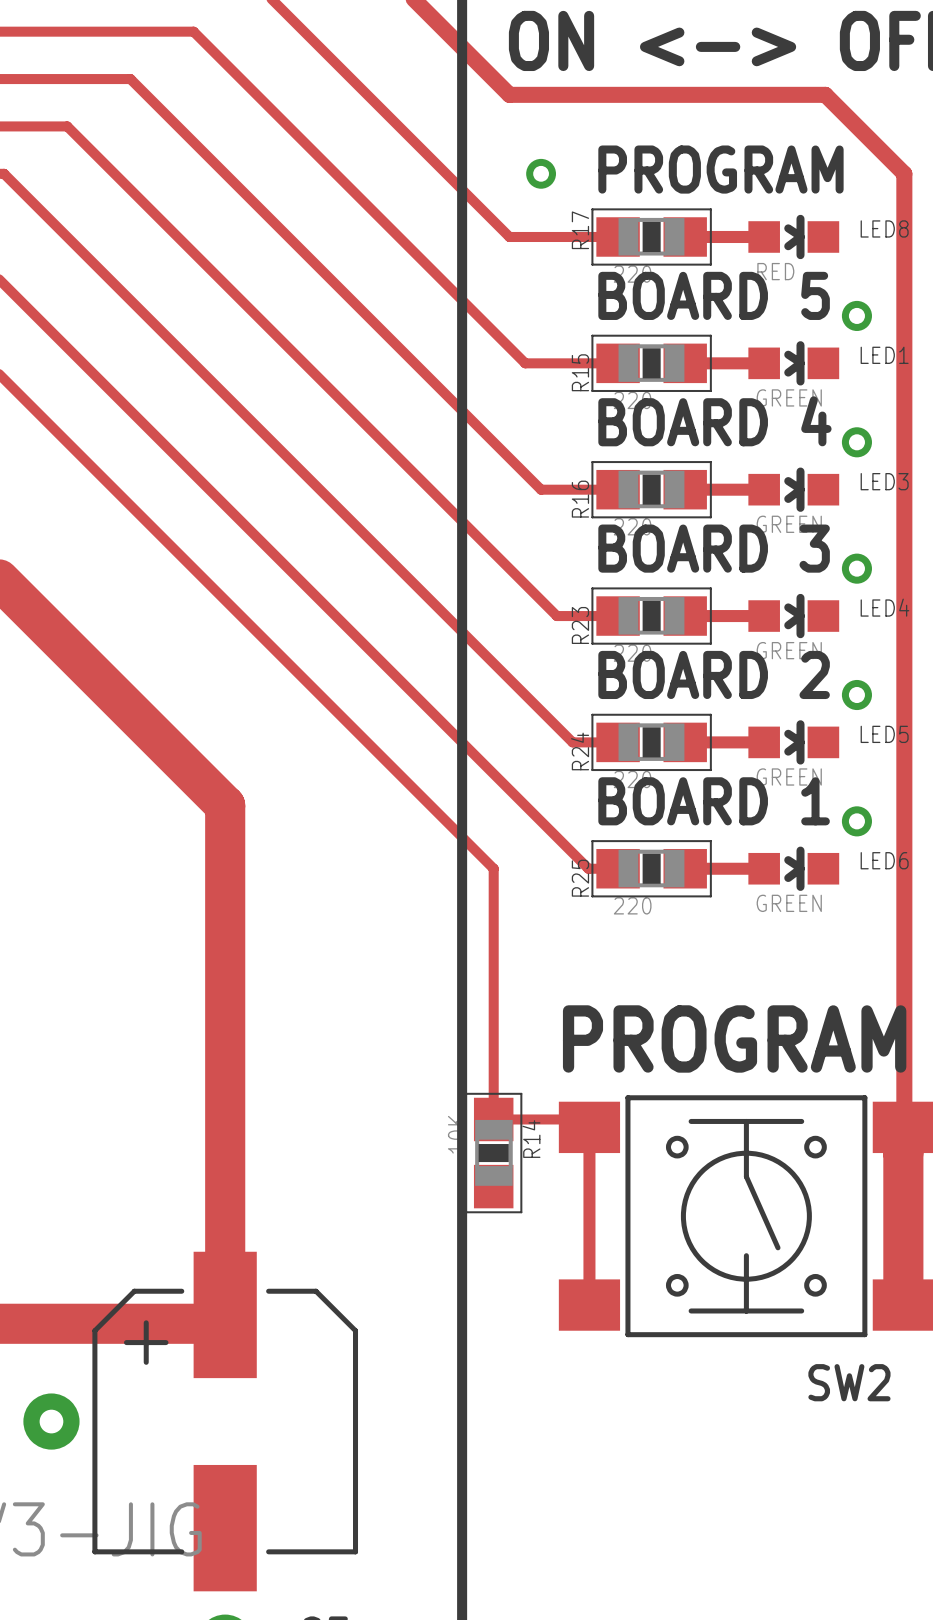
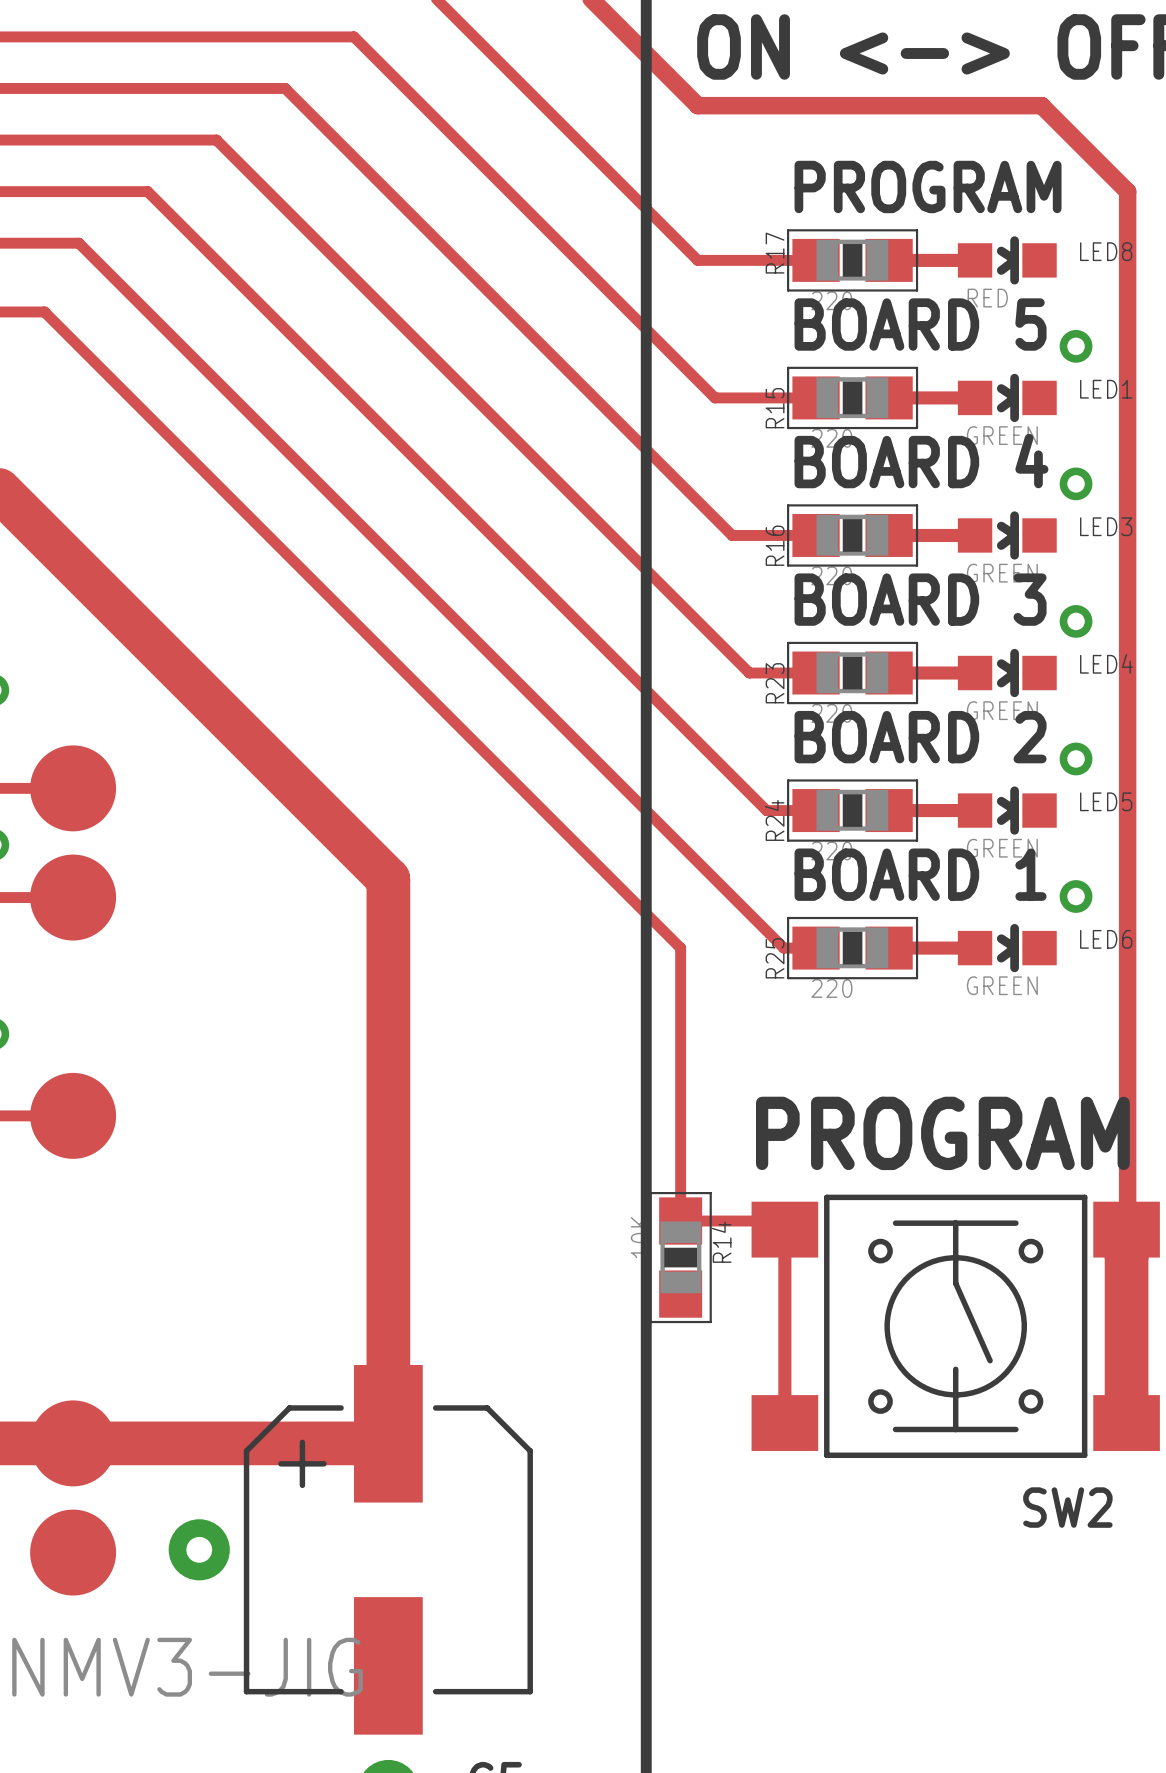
via: (541, 173) -> none

